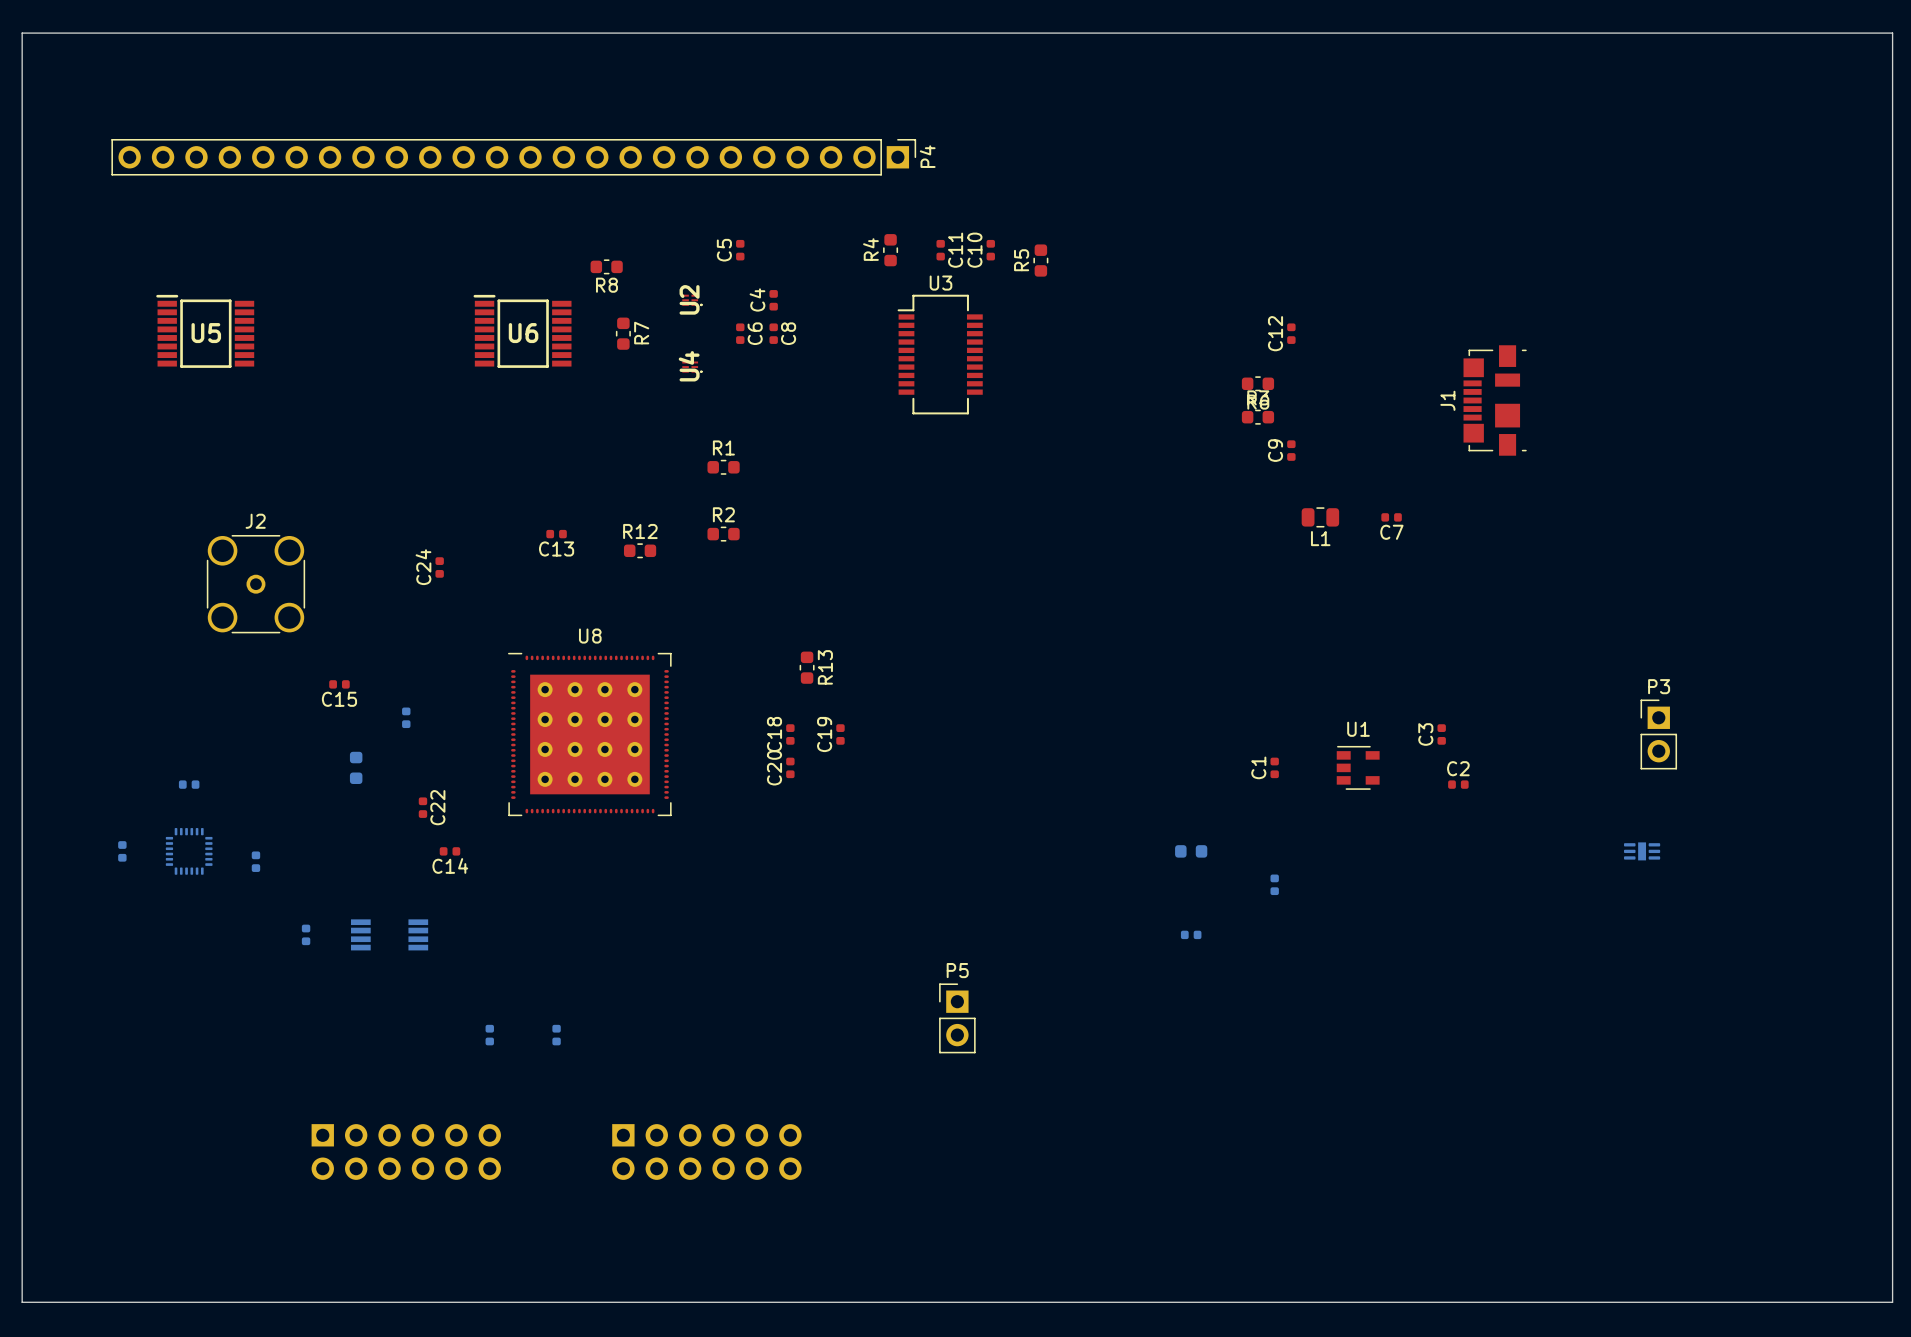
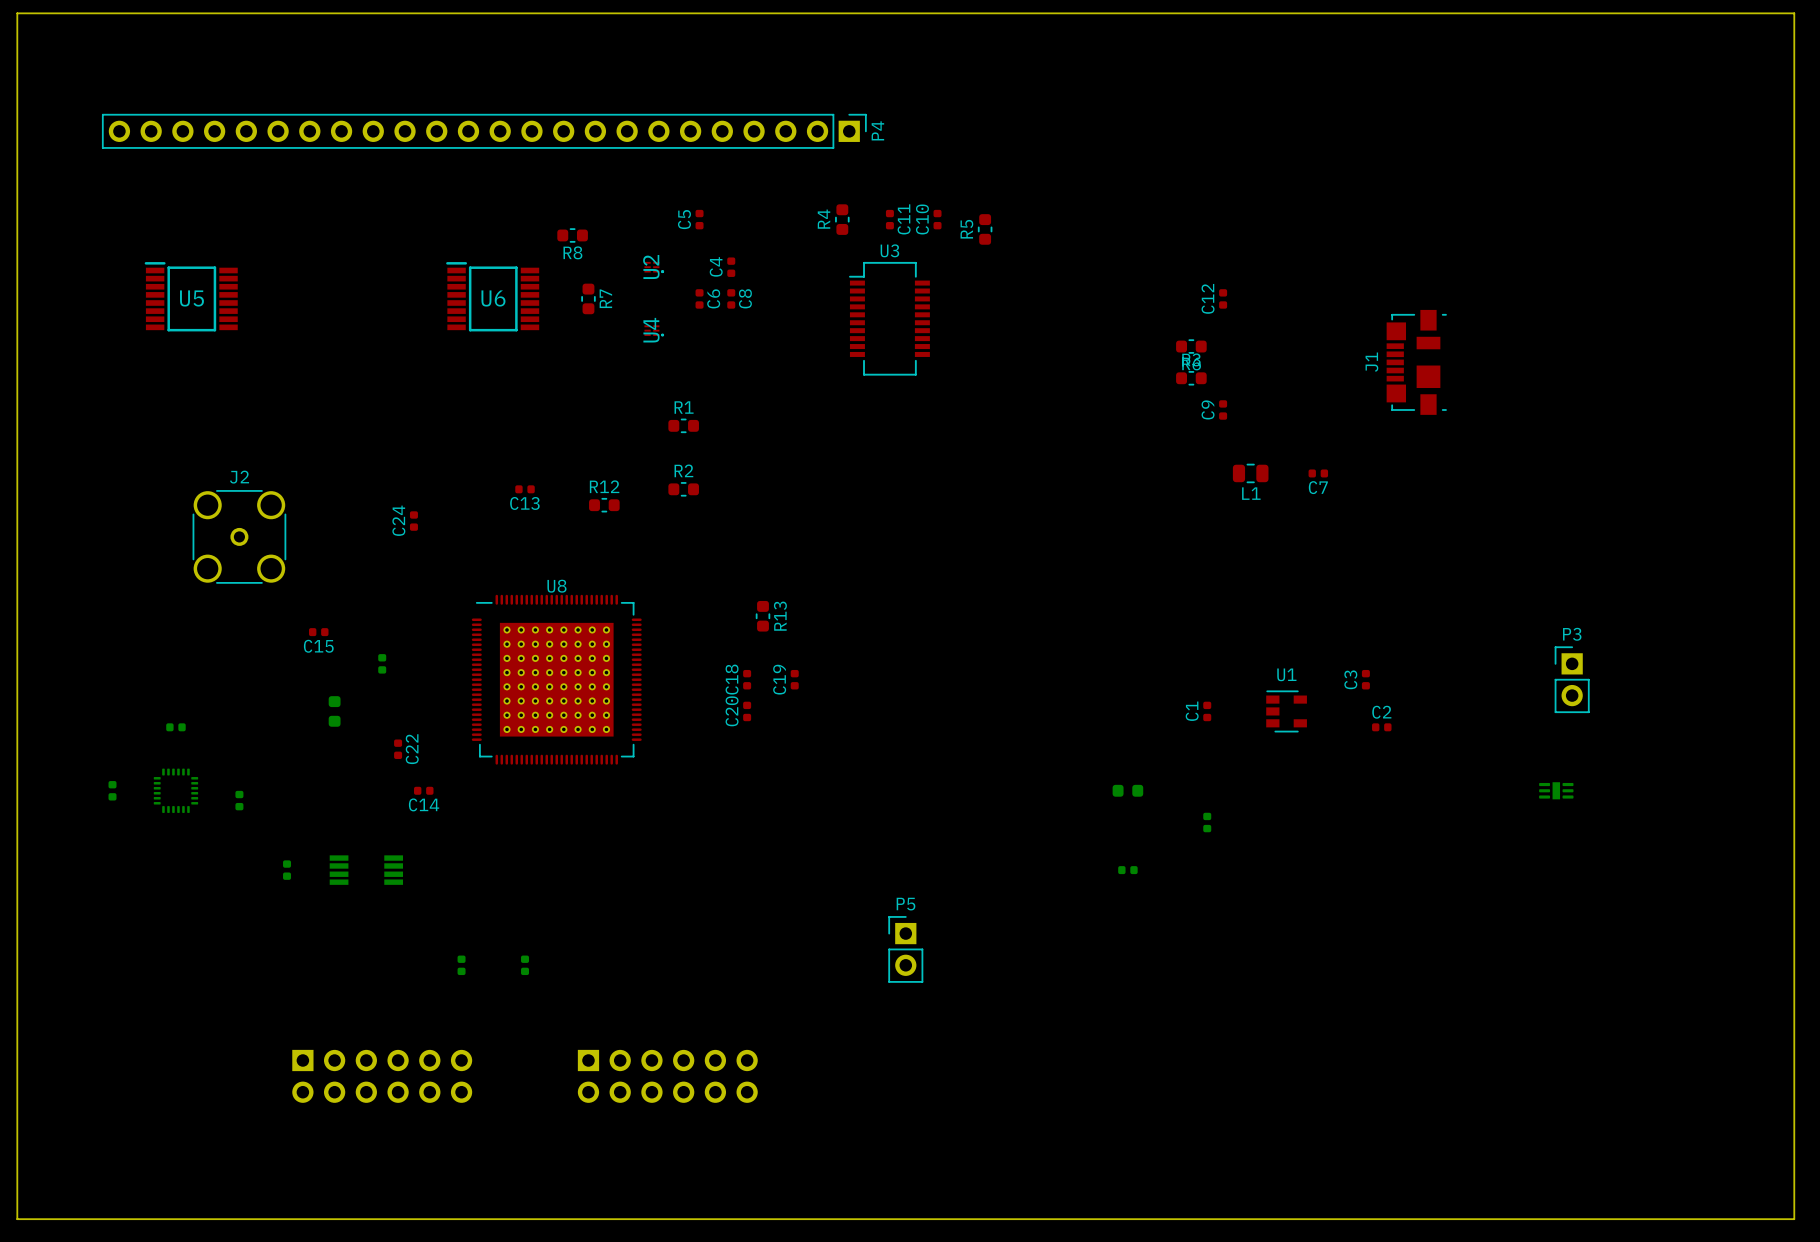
U8 footprint: [507, 652, 672, 817] -> [471, 594, 642, 765]

